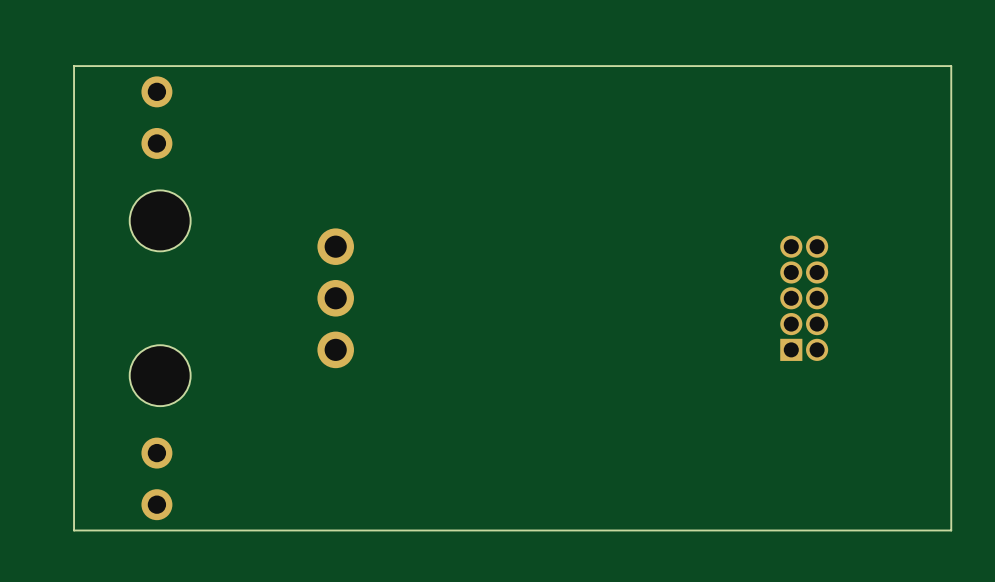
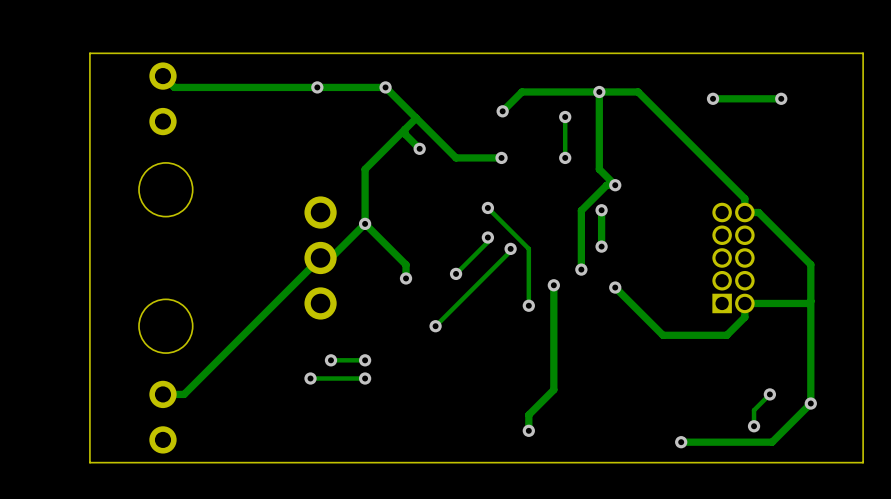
track: none -> (162, 76) (174, 87) (385, 87) (456, 157) (501, 157)
via: none -> (317, 87)
via: none -> (385, 87)
track: none -> (599, 91) (599, 169) (615, 185) (606, 185) (581, 210) (581, 269)
via: none -> (599, 91)
via: none -> (713, 98)
track: none -> (781, 98) (713, 98)
via: none -> (781, 98)
track: none -> (502, 111) (522, 91) (638, 91) (744, 198) (744, 212) (758, 212) (810, 264) (810, 403) (772, 442) (681, 442)
via: none -> (502, 111)
track: none -> (565, 116) (565, 157)
via: none -> (565, 116)
track: none -> (416, 118) (365, 169) (365, 223)
track: none -> (404, 129) (404, 134) (419, 148)
via: none -> (419, 148)
via: none -> (501, 157)
via: none -> (565, 157)
via: none -> (615, 185)
track: none -> (487, 207) (528, 248) (528, 305)
via: none -> (487, 207)
track: none -> (601, 210) (601, 246)
via: none -> (601, 210)
track: none -> (365, 223) (330, 257) (320, 257) (184, 394) (162, 394)
track: none -> (365, 223) (406, 264) (406, 278)
via: none -> (365, 223)
track: none -> (487, 237) (487, 242) (456, 273)
via: none -> (487, 237)
via: none -> (601, 246)
track: none -> (510, 248) (510, 251) (435, 326)
via: none -> (510, 248)
via: none -> (581, 269)
via: none -> (456, 273)
via: none -> (406, 278)
track: none -> (553, 285) (553, 389) (528, 414) (528, 430)
via: none -> (553, 285)
track: none -> (615, 287) (662, 335) (726, 335) (744, 317) (744, 303) (808, 303) (810, 301)
via: none -> (615, 287)
via: none -> (528, 305)
via: none -> (435, 326)
via: none -> (330, 360)
track: none -> (365, 360) (330, 360)
via: none -> (365, 360)
via: none -> (310, 378)
track: none -> (365, 378) (310, 378)
via: none -> (365, 378)
track: none -> (769, 394) (754, 410) (754, 426)
via: none -> (769, 394)
via: none -> (810, 403)
via: none -> (754, 426)
via: none -> (528, 430)
via: none -> (681, 442)

